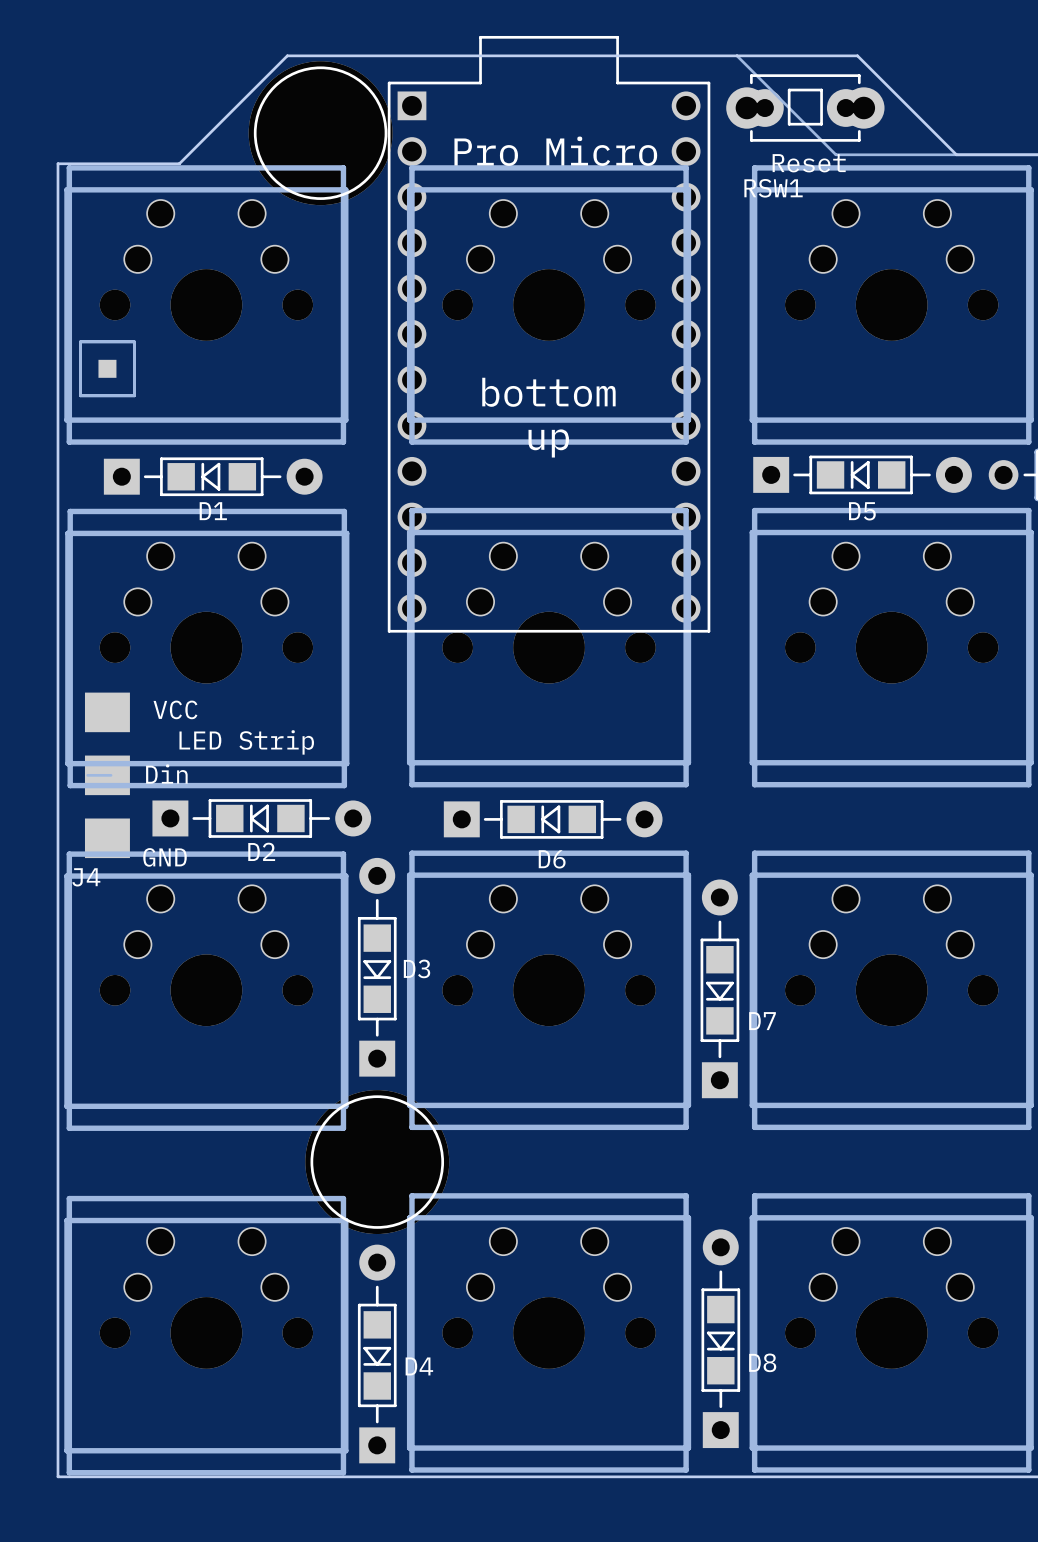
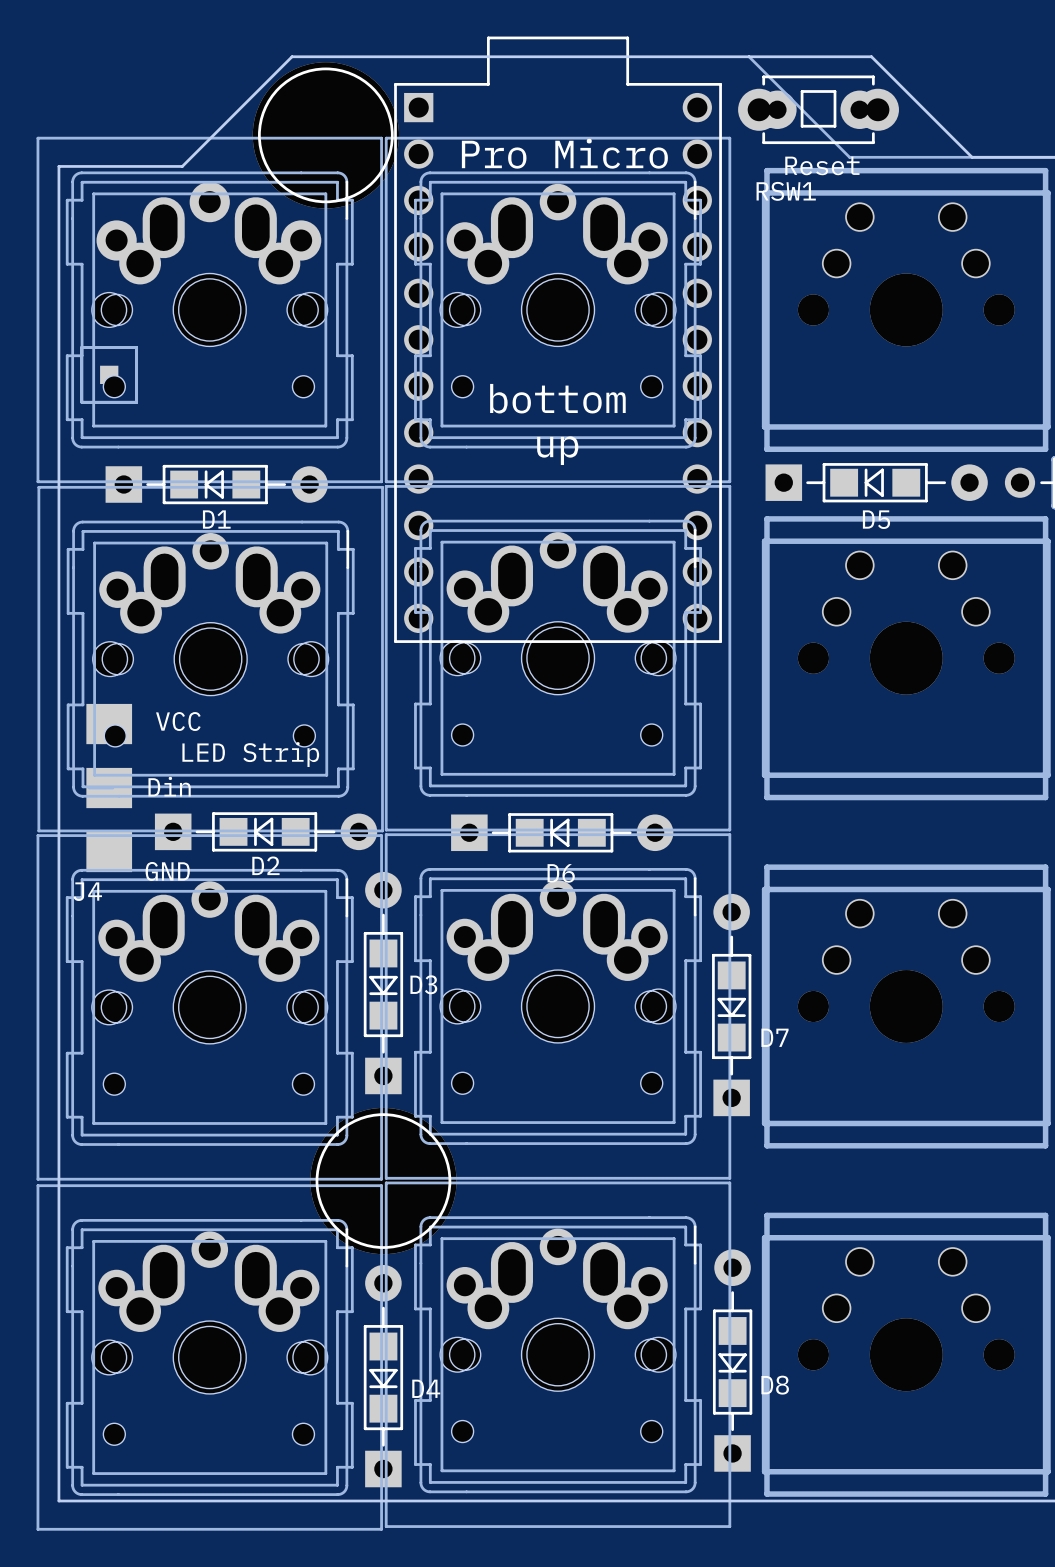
part footprint: [64, 165, 349, 445] -> [36, 136, 383, 484]
part footprint: [406, 165, 692, 445] -> [384, 136, 732, 484]
part footprint: [406, 507, 692, 788] -> [384, 485, 732, 832]
part footprint: [65, 508, 350, 789] -> [37, 485, 384, 833]
part footprint: [406, 850, 692, 1131] -> [384, 833, 732, 1180]
part footprint: [64, 851, 349, 1131] -> [36, 834, 383, 1181]
part footprint: [406, 1193, 692, 1473] -> [384, 1181, 732, 1528]
part footprint: [64, 1195, 349, 1476] -> [36, 1184, 383, 1531]

